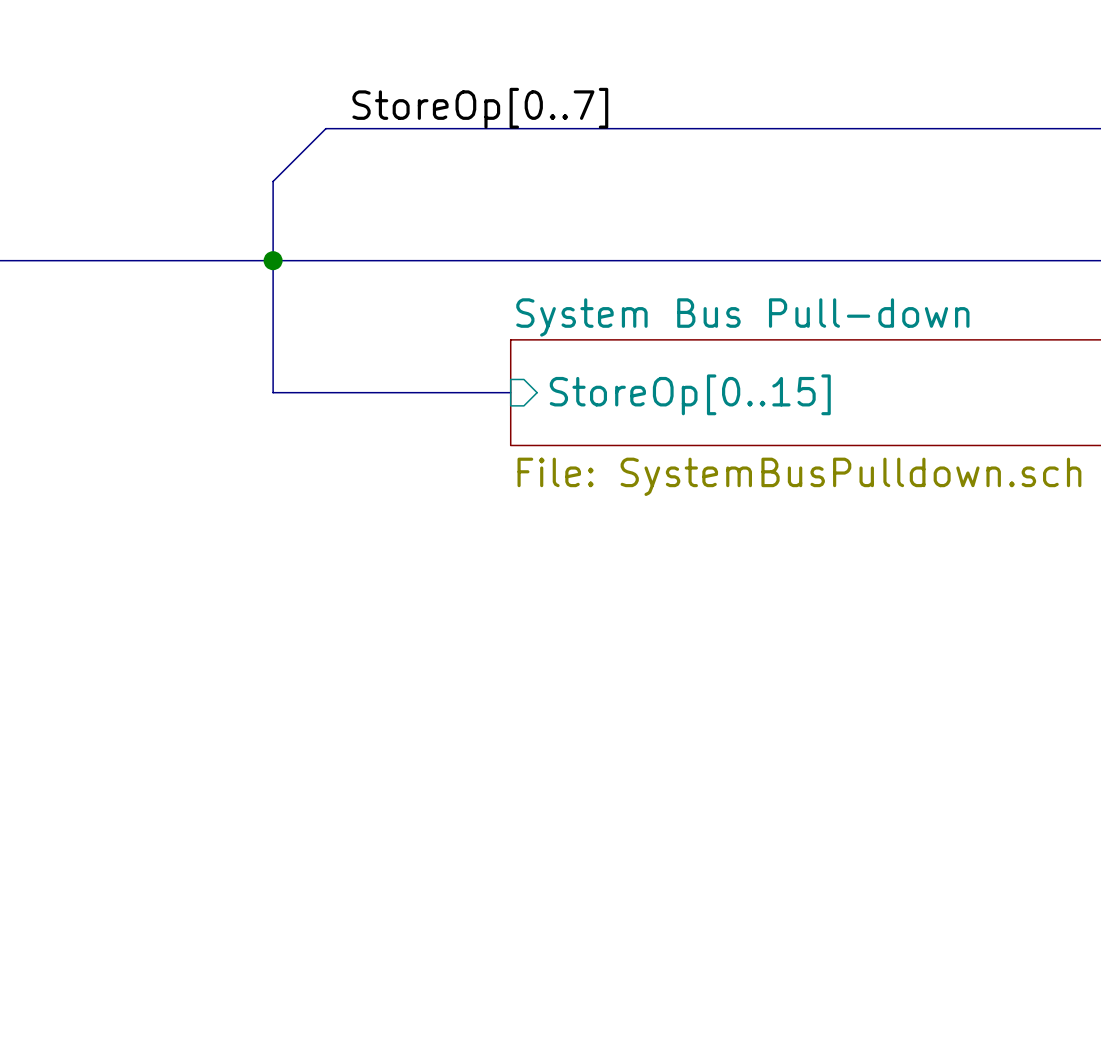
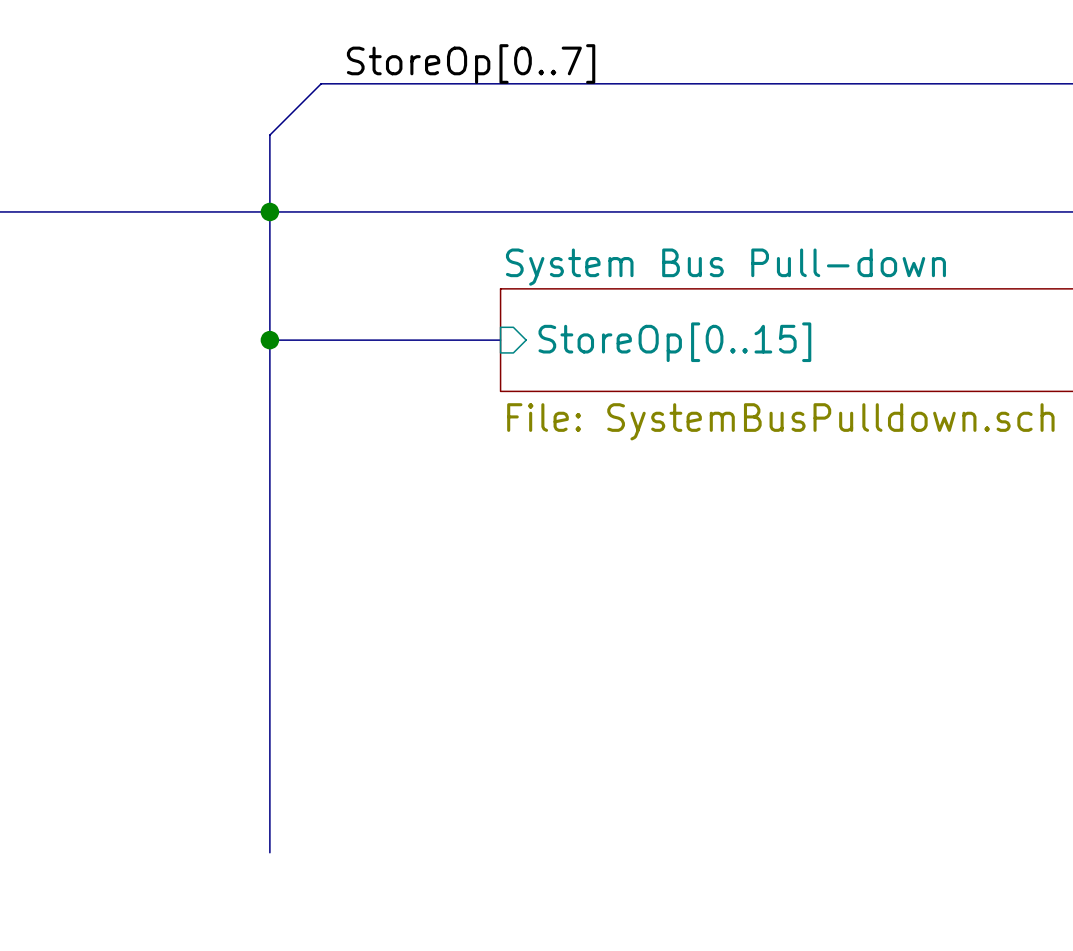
bus: none -> (269, 340) (269, 852)
junction: none -> (269, 340)

